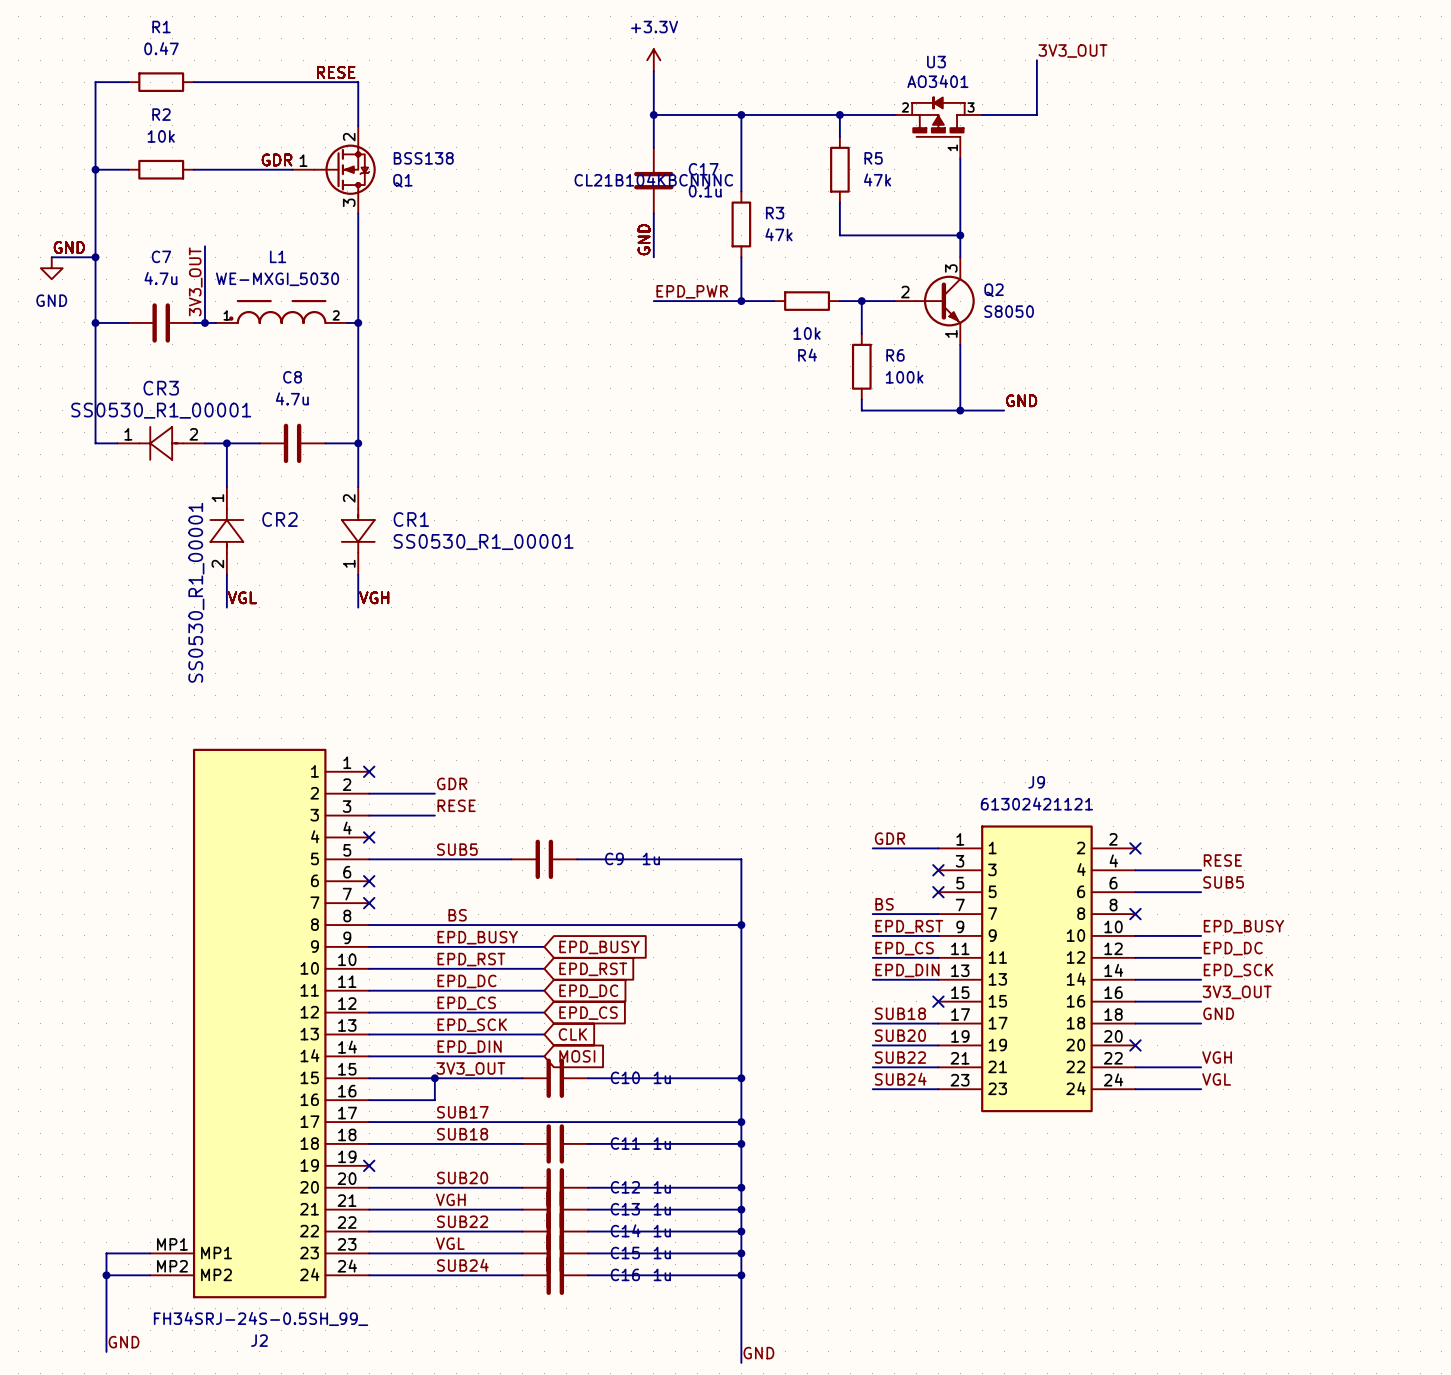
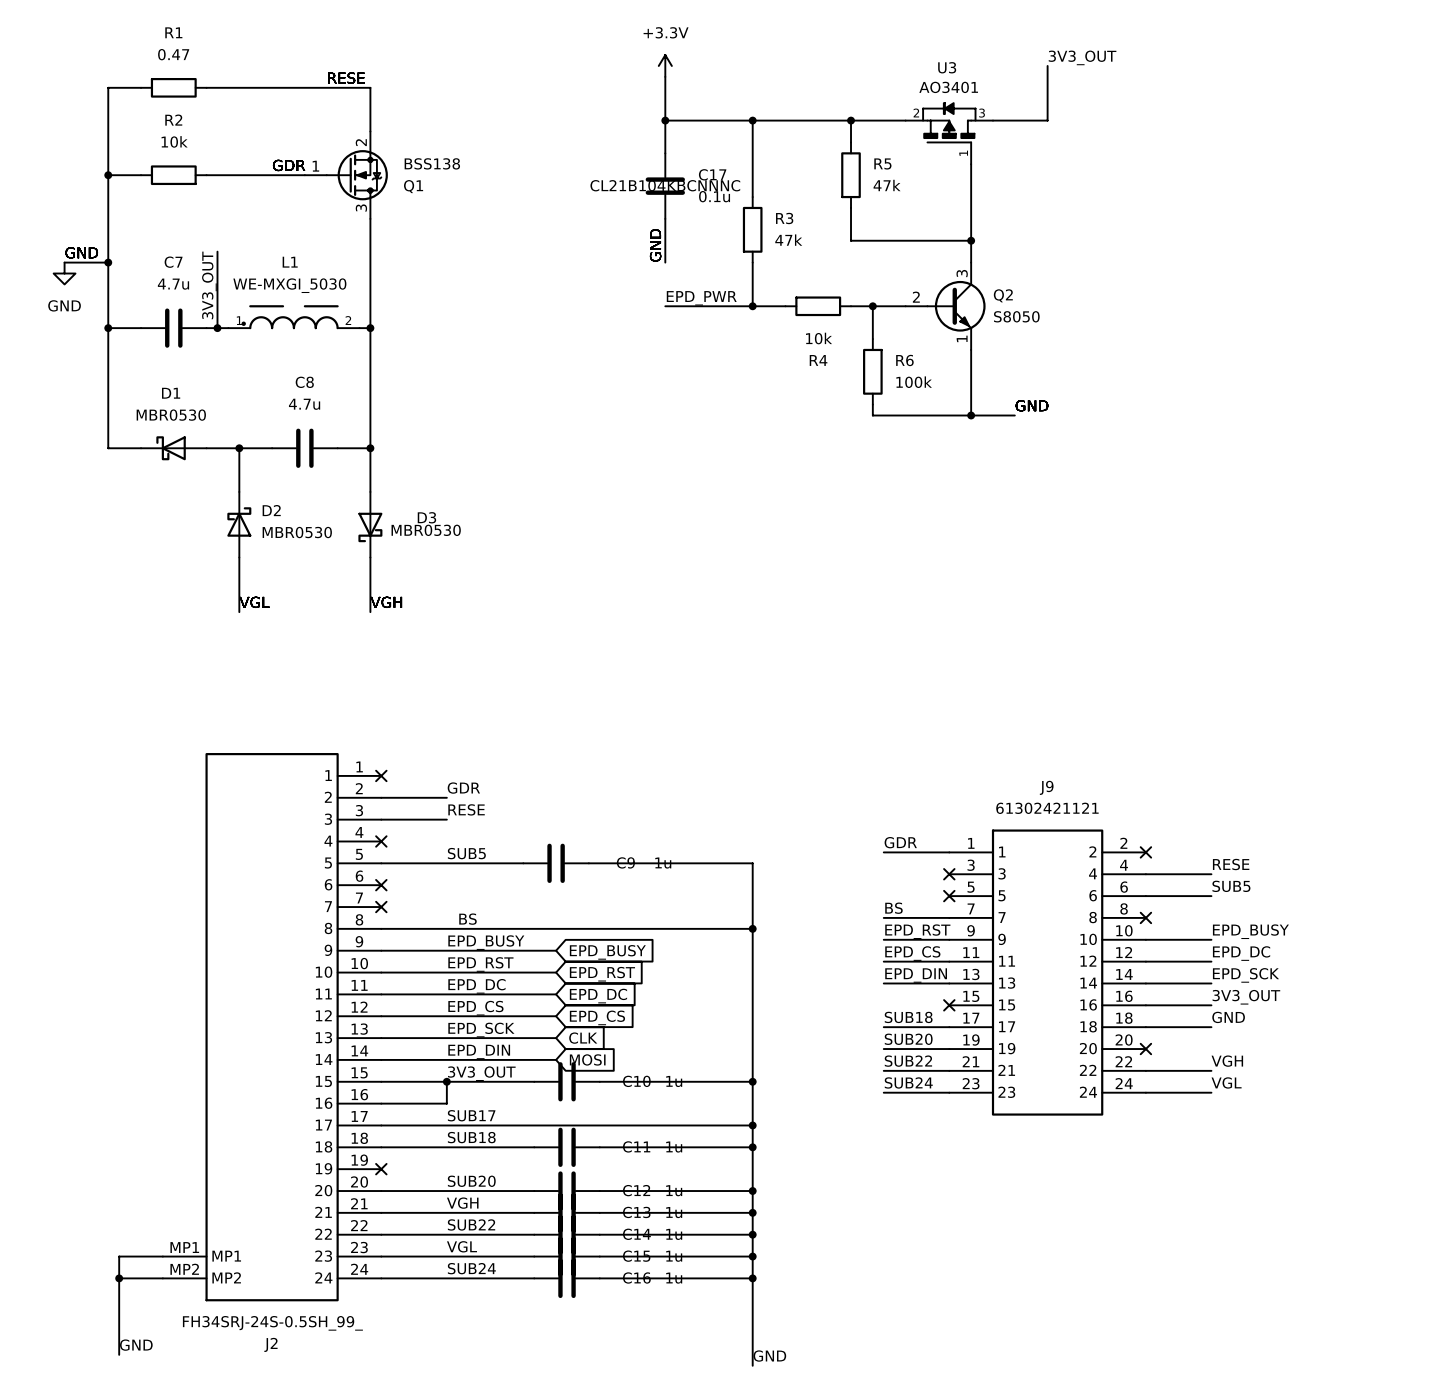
CR3: SS0530_R1_00001 (161, 443) -> none
D1: none -> MBR0530 (173, 448)
D2: none -> MBR0530 (239, 524)
D3: none -> MBR0530 (370, 524)
CR2: SS0530_R1_00001 (226, 530) -> none
CR1: SS0530_R1_00001 (358, 530) -> none

